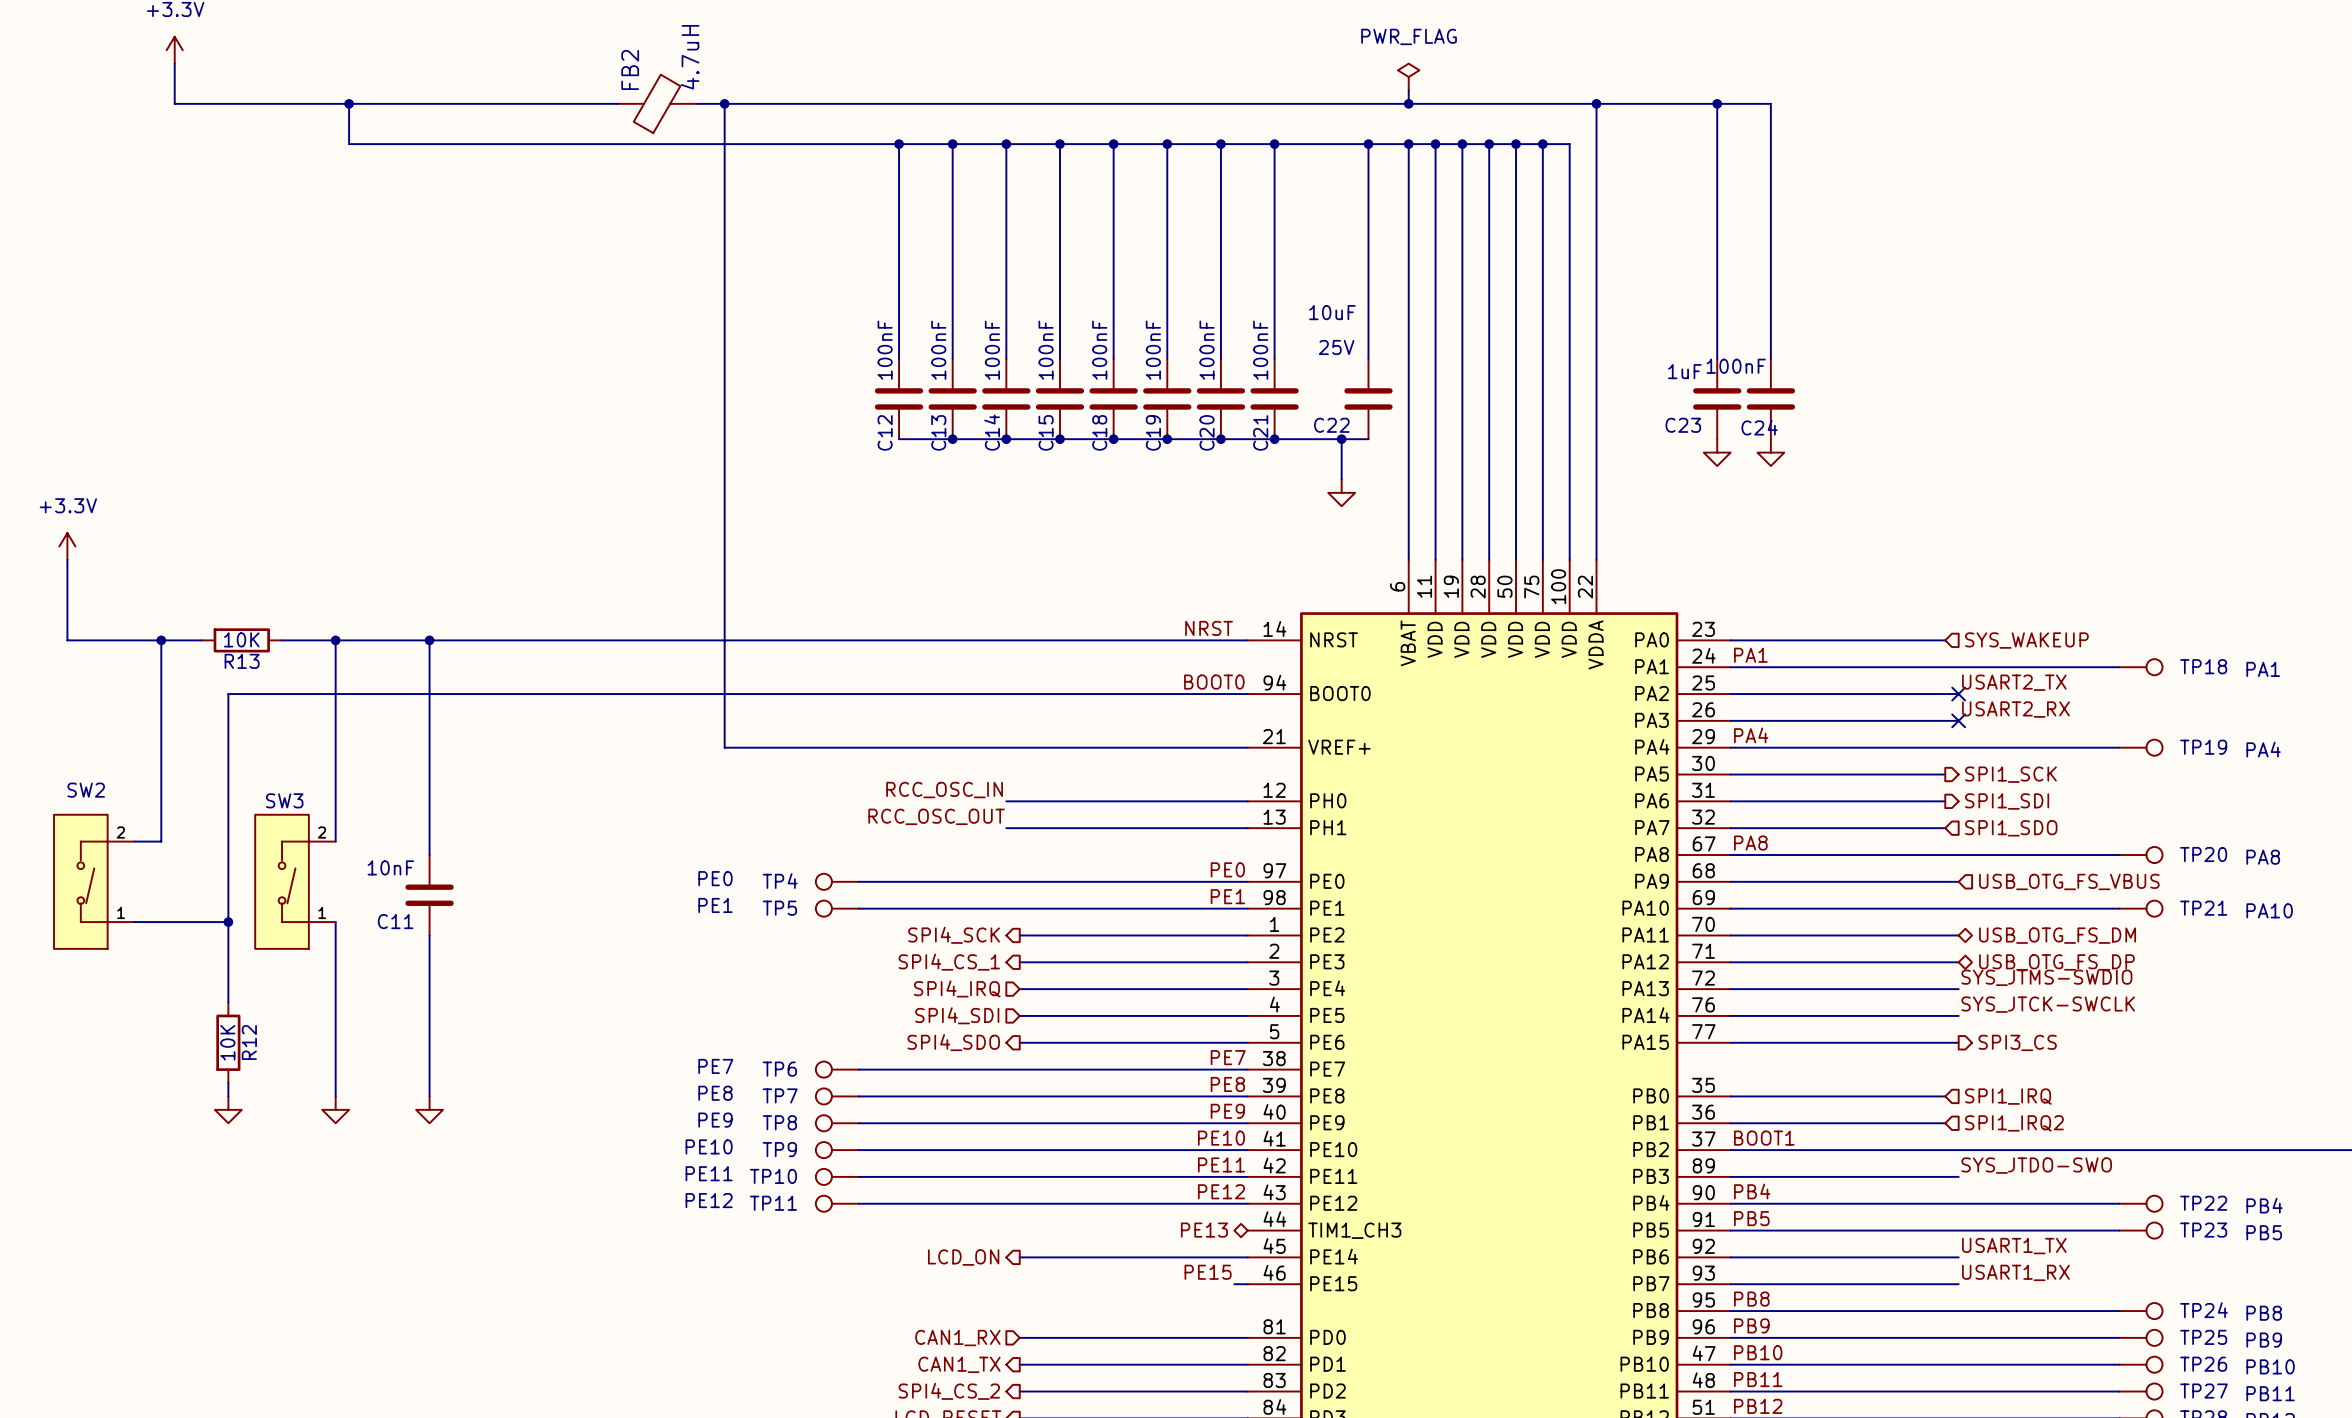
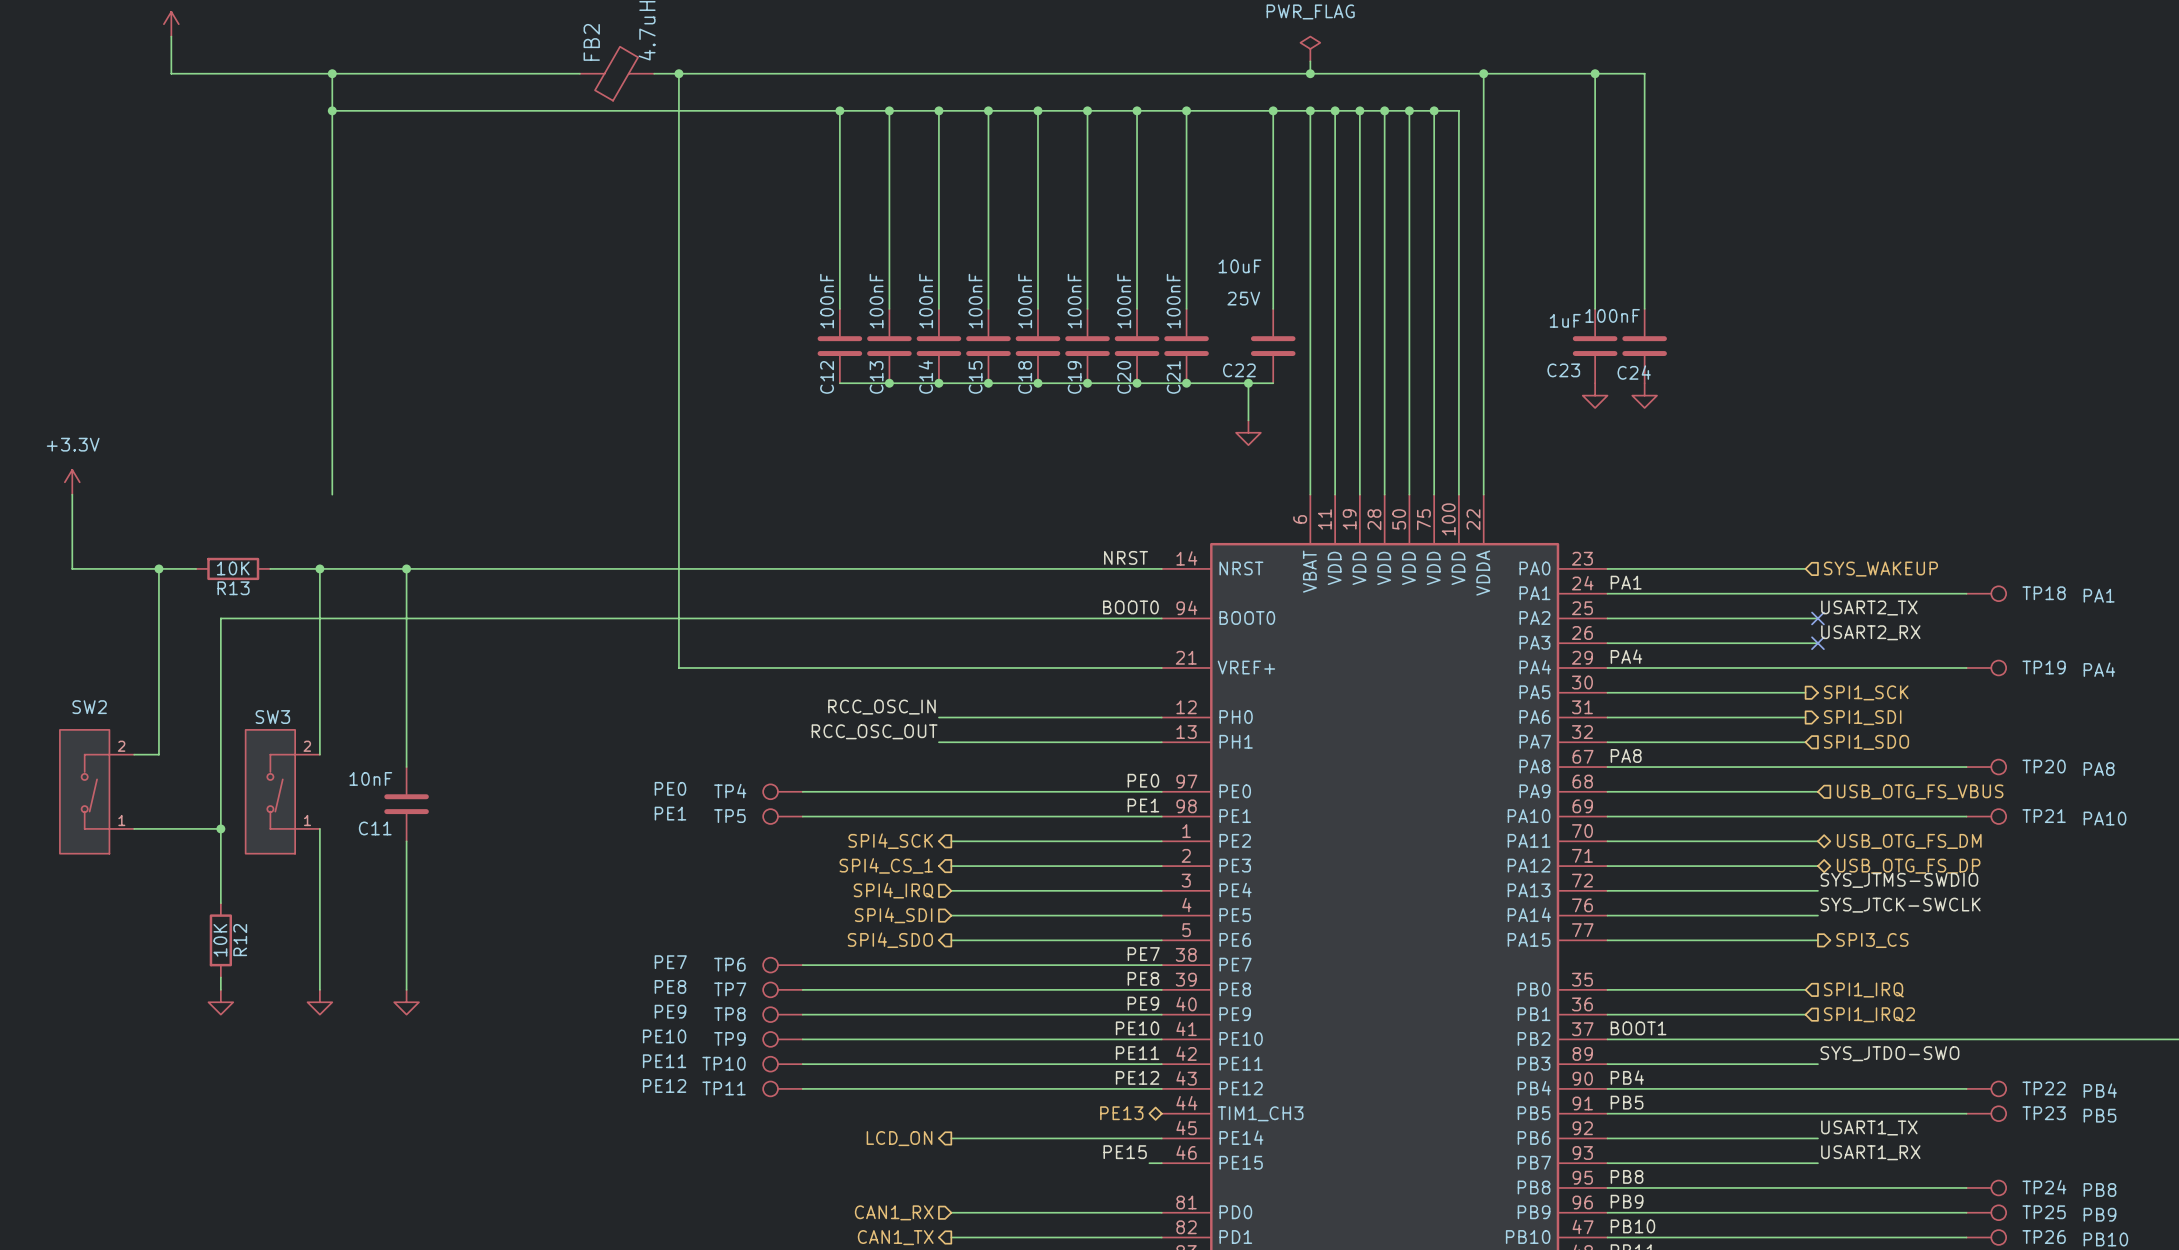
wire: none -> (332, 110) (332, 494)
junction: none -> (332, 110)

